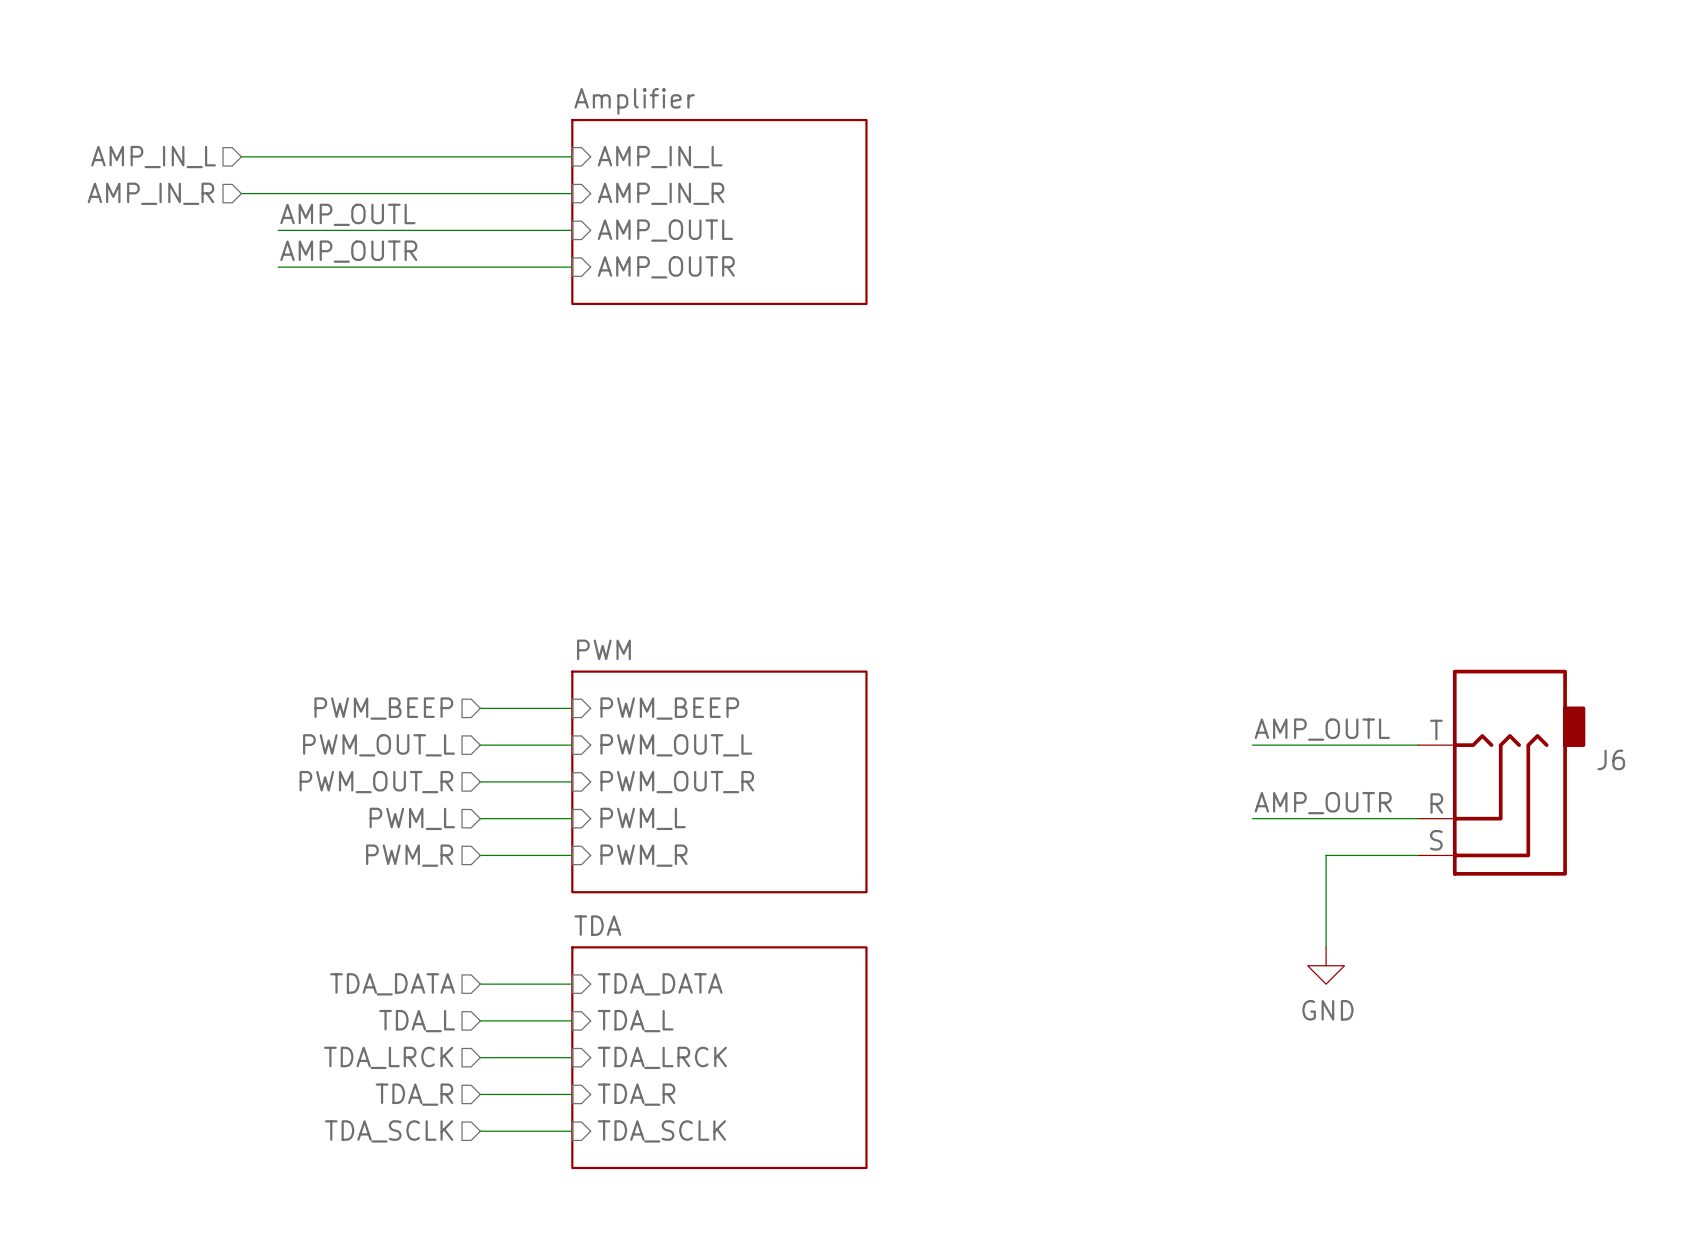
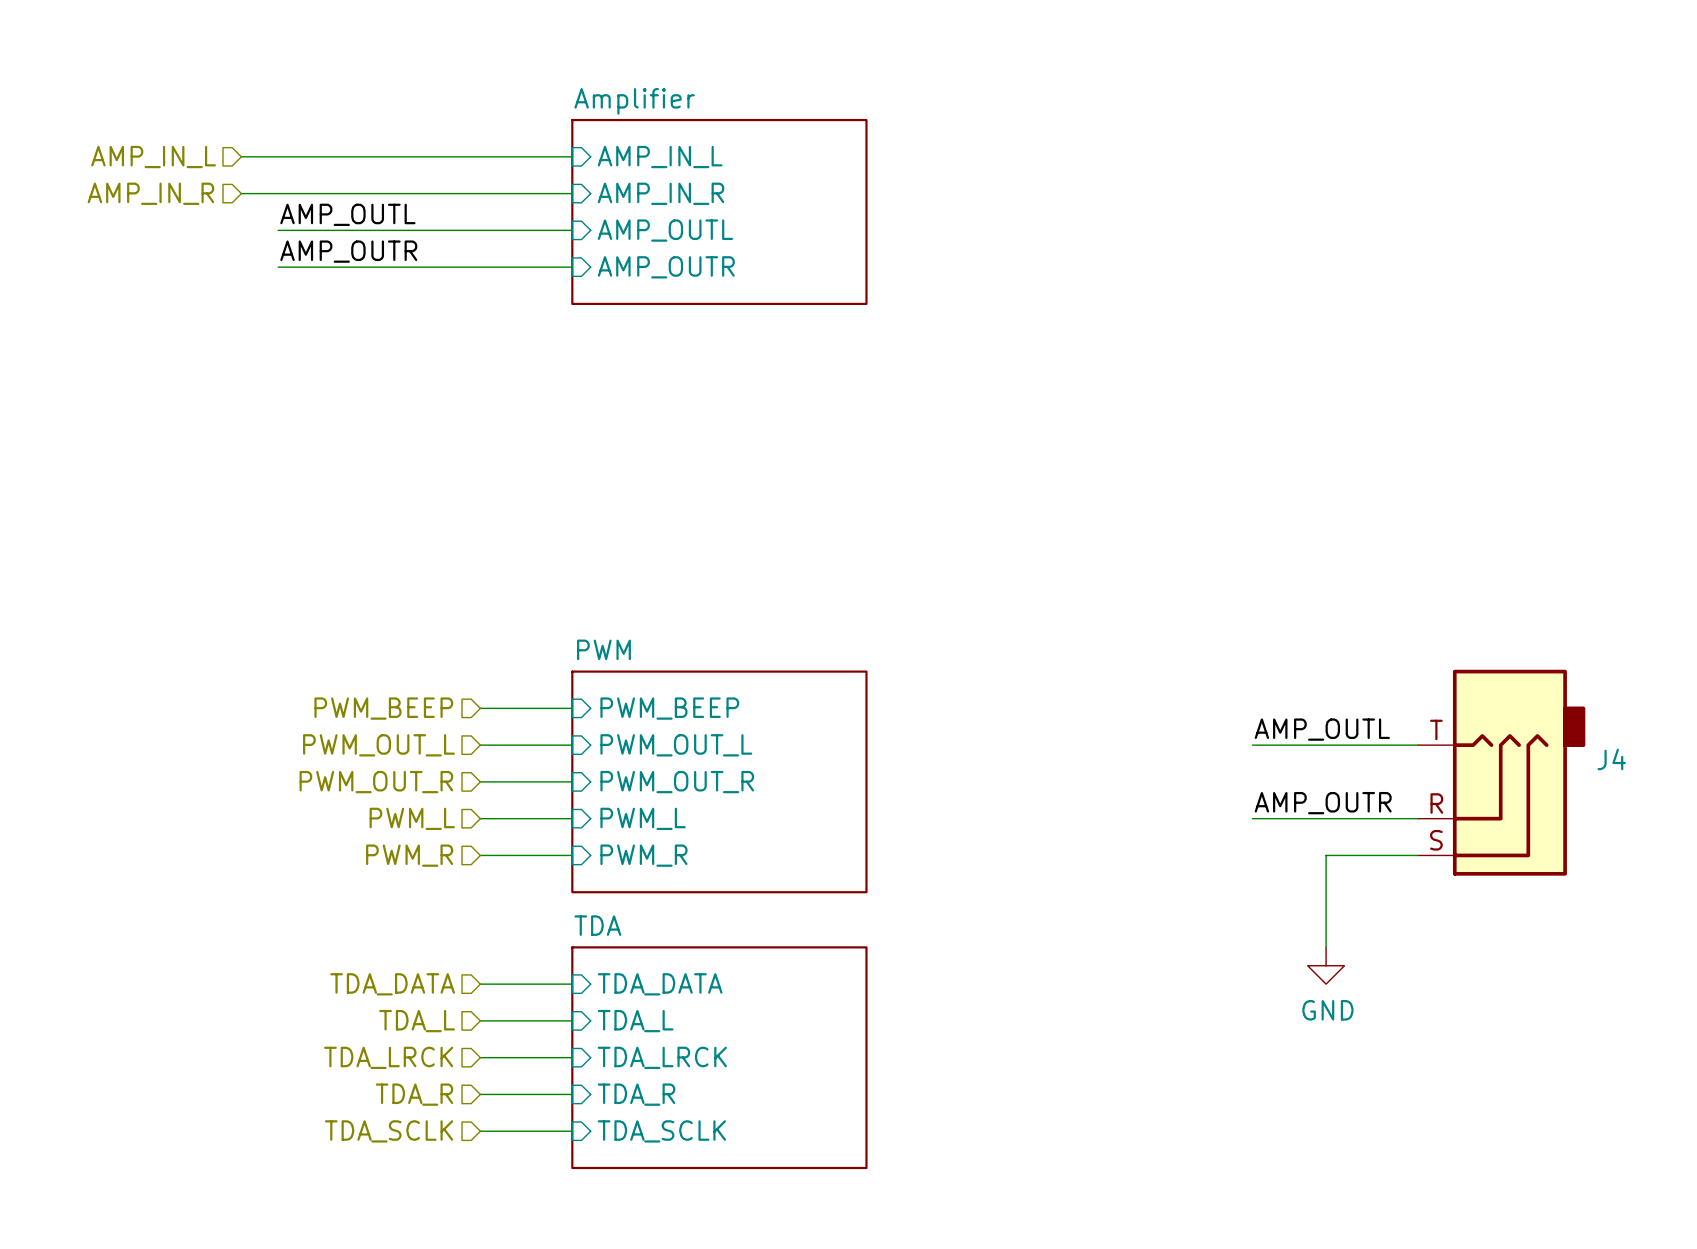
J6 name: J6 (1611, 759) -> J4 (1611, 759)

